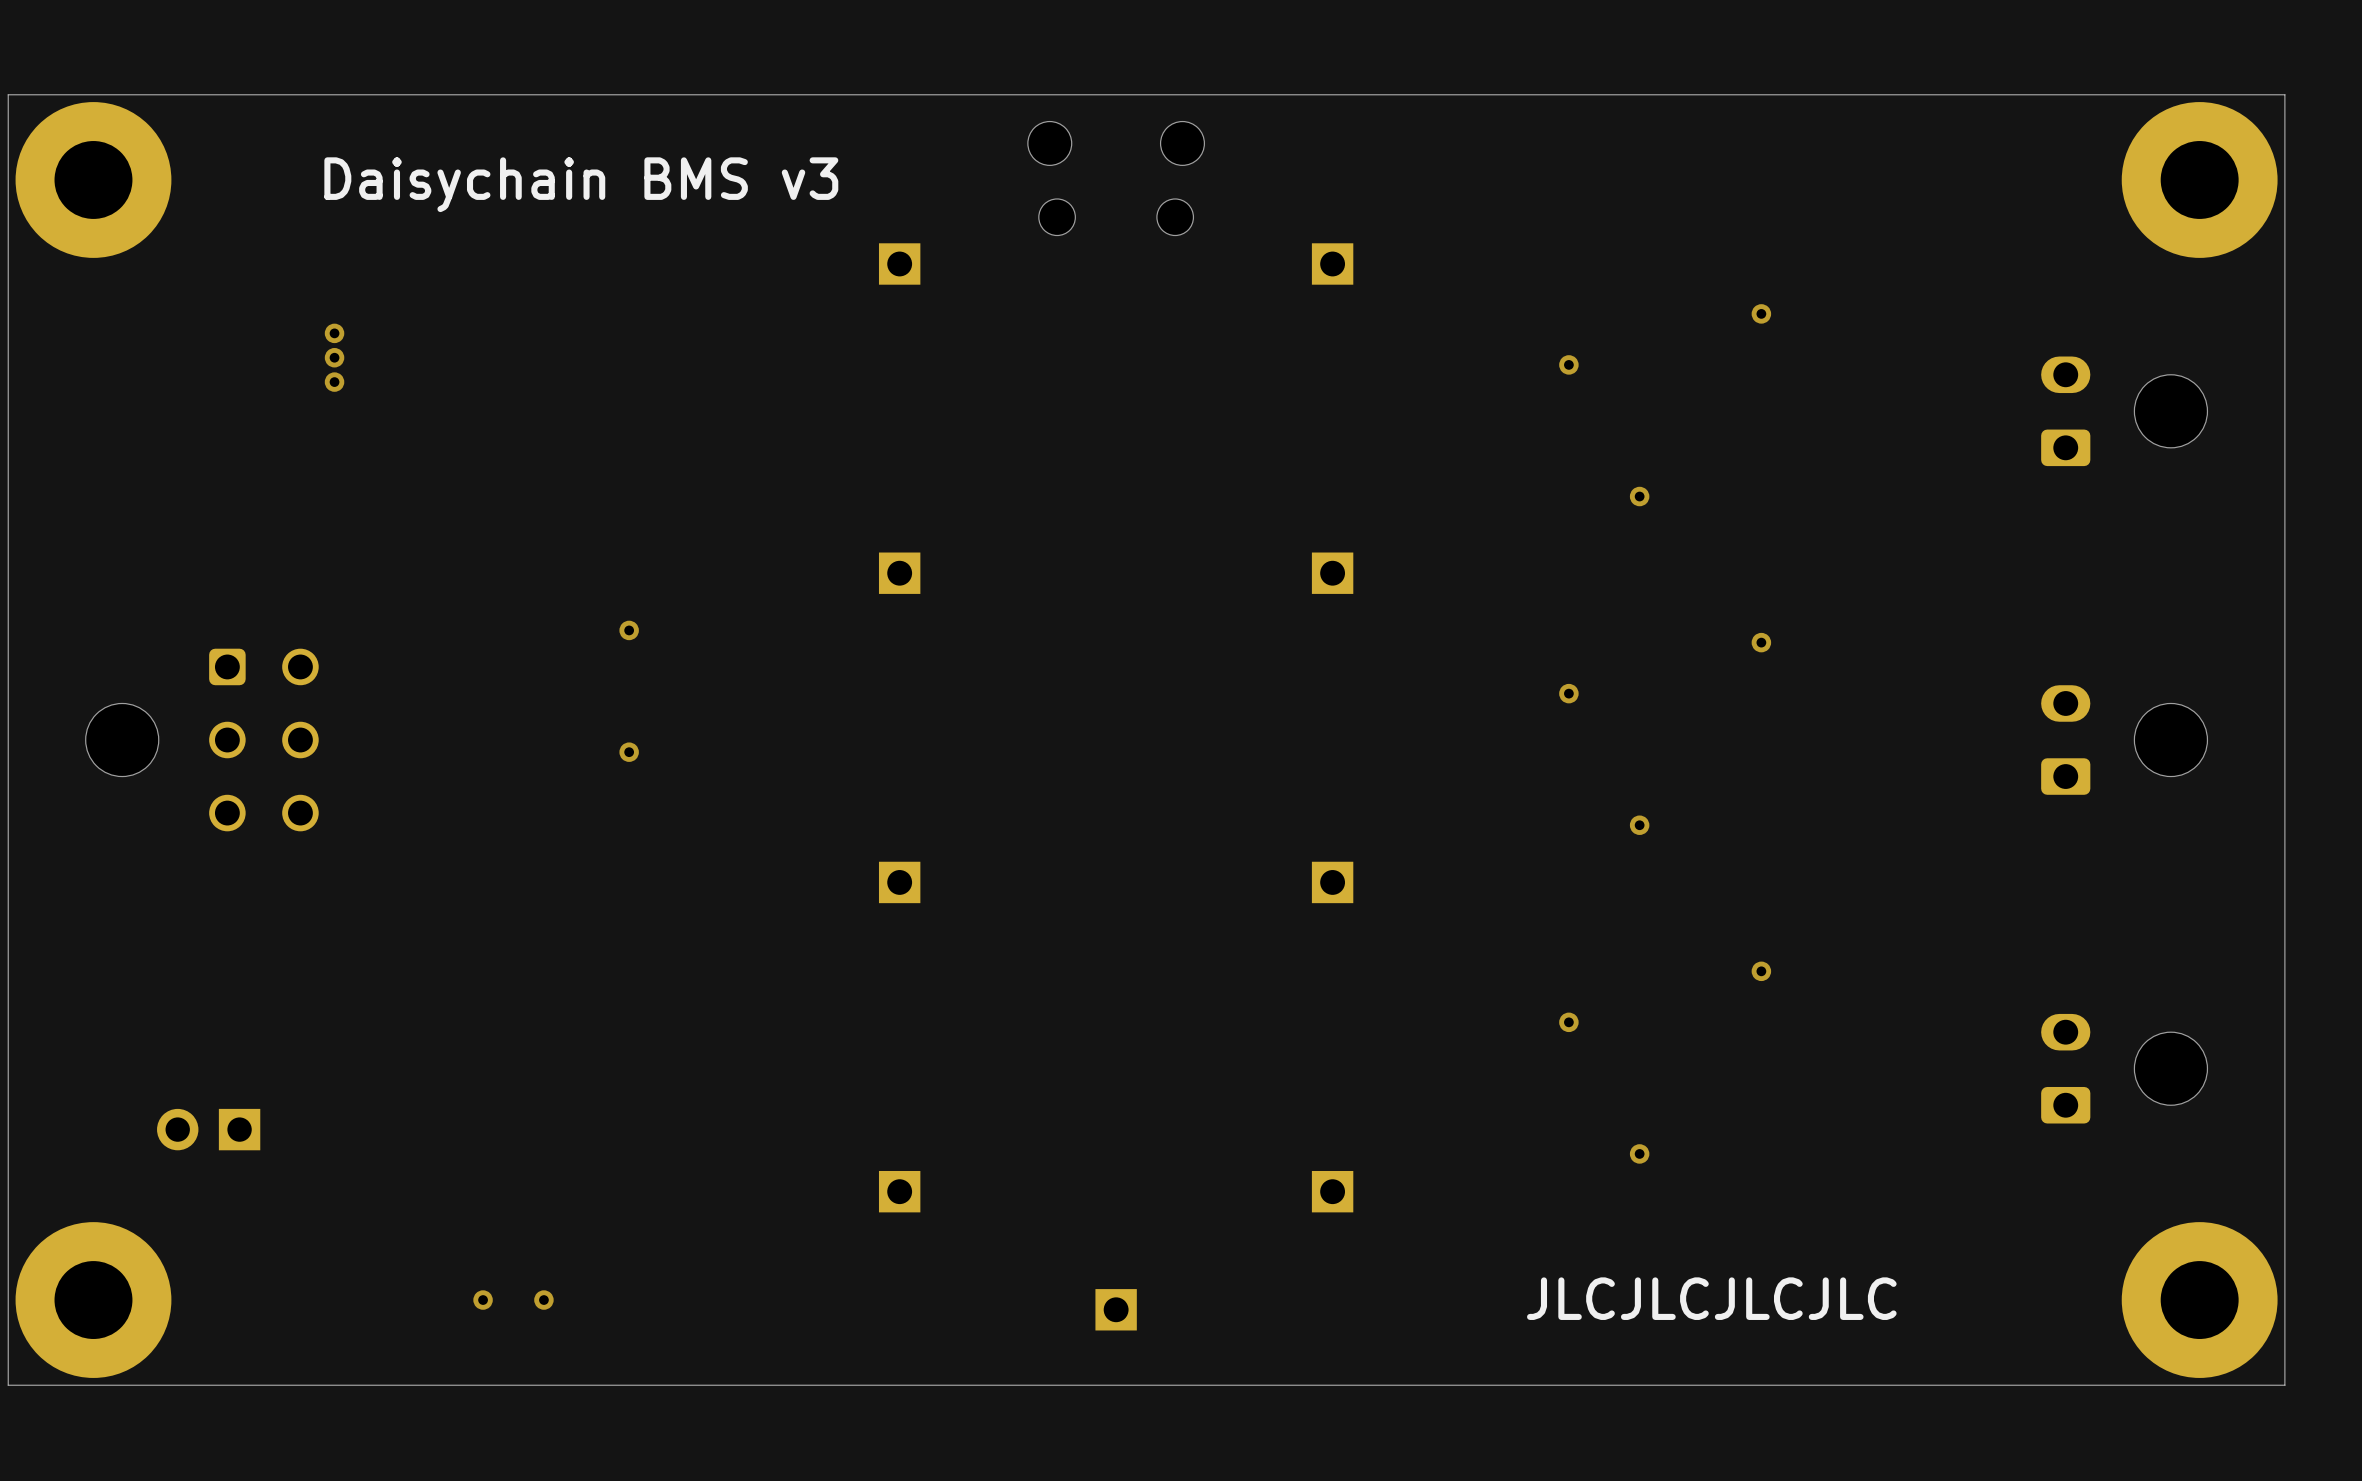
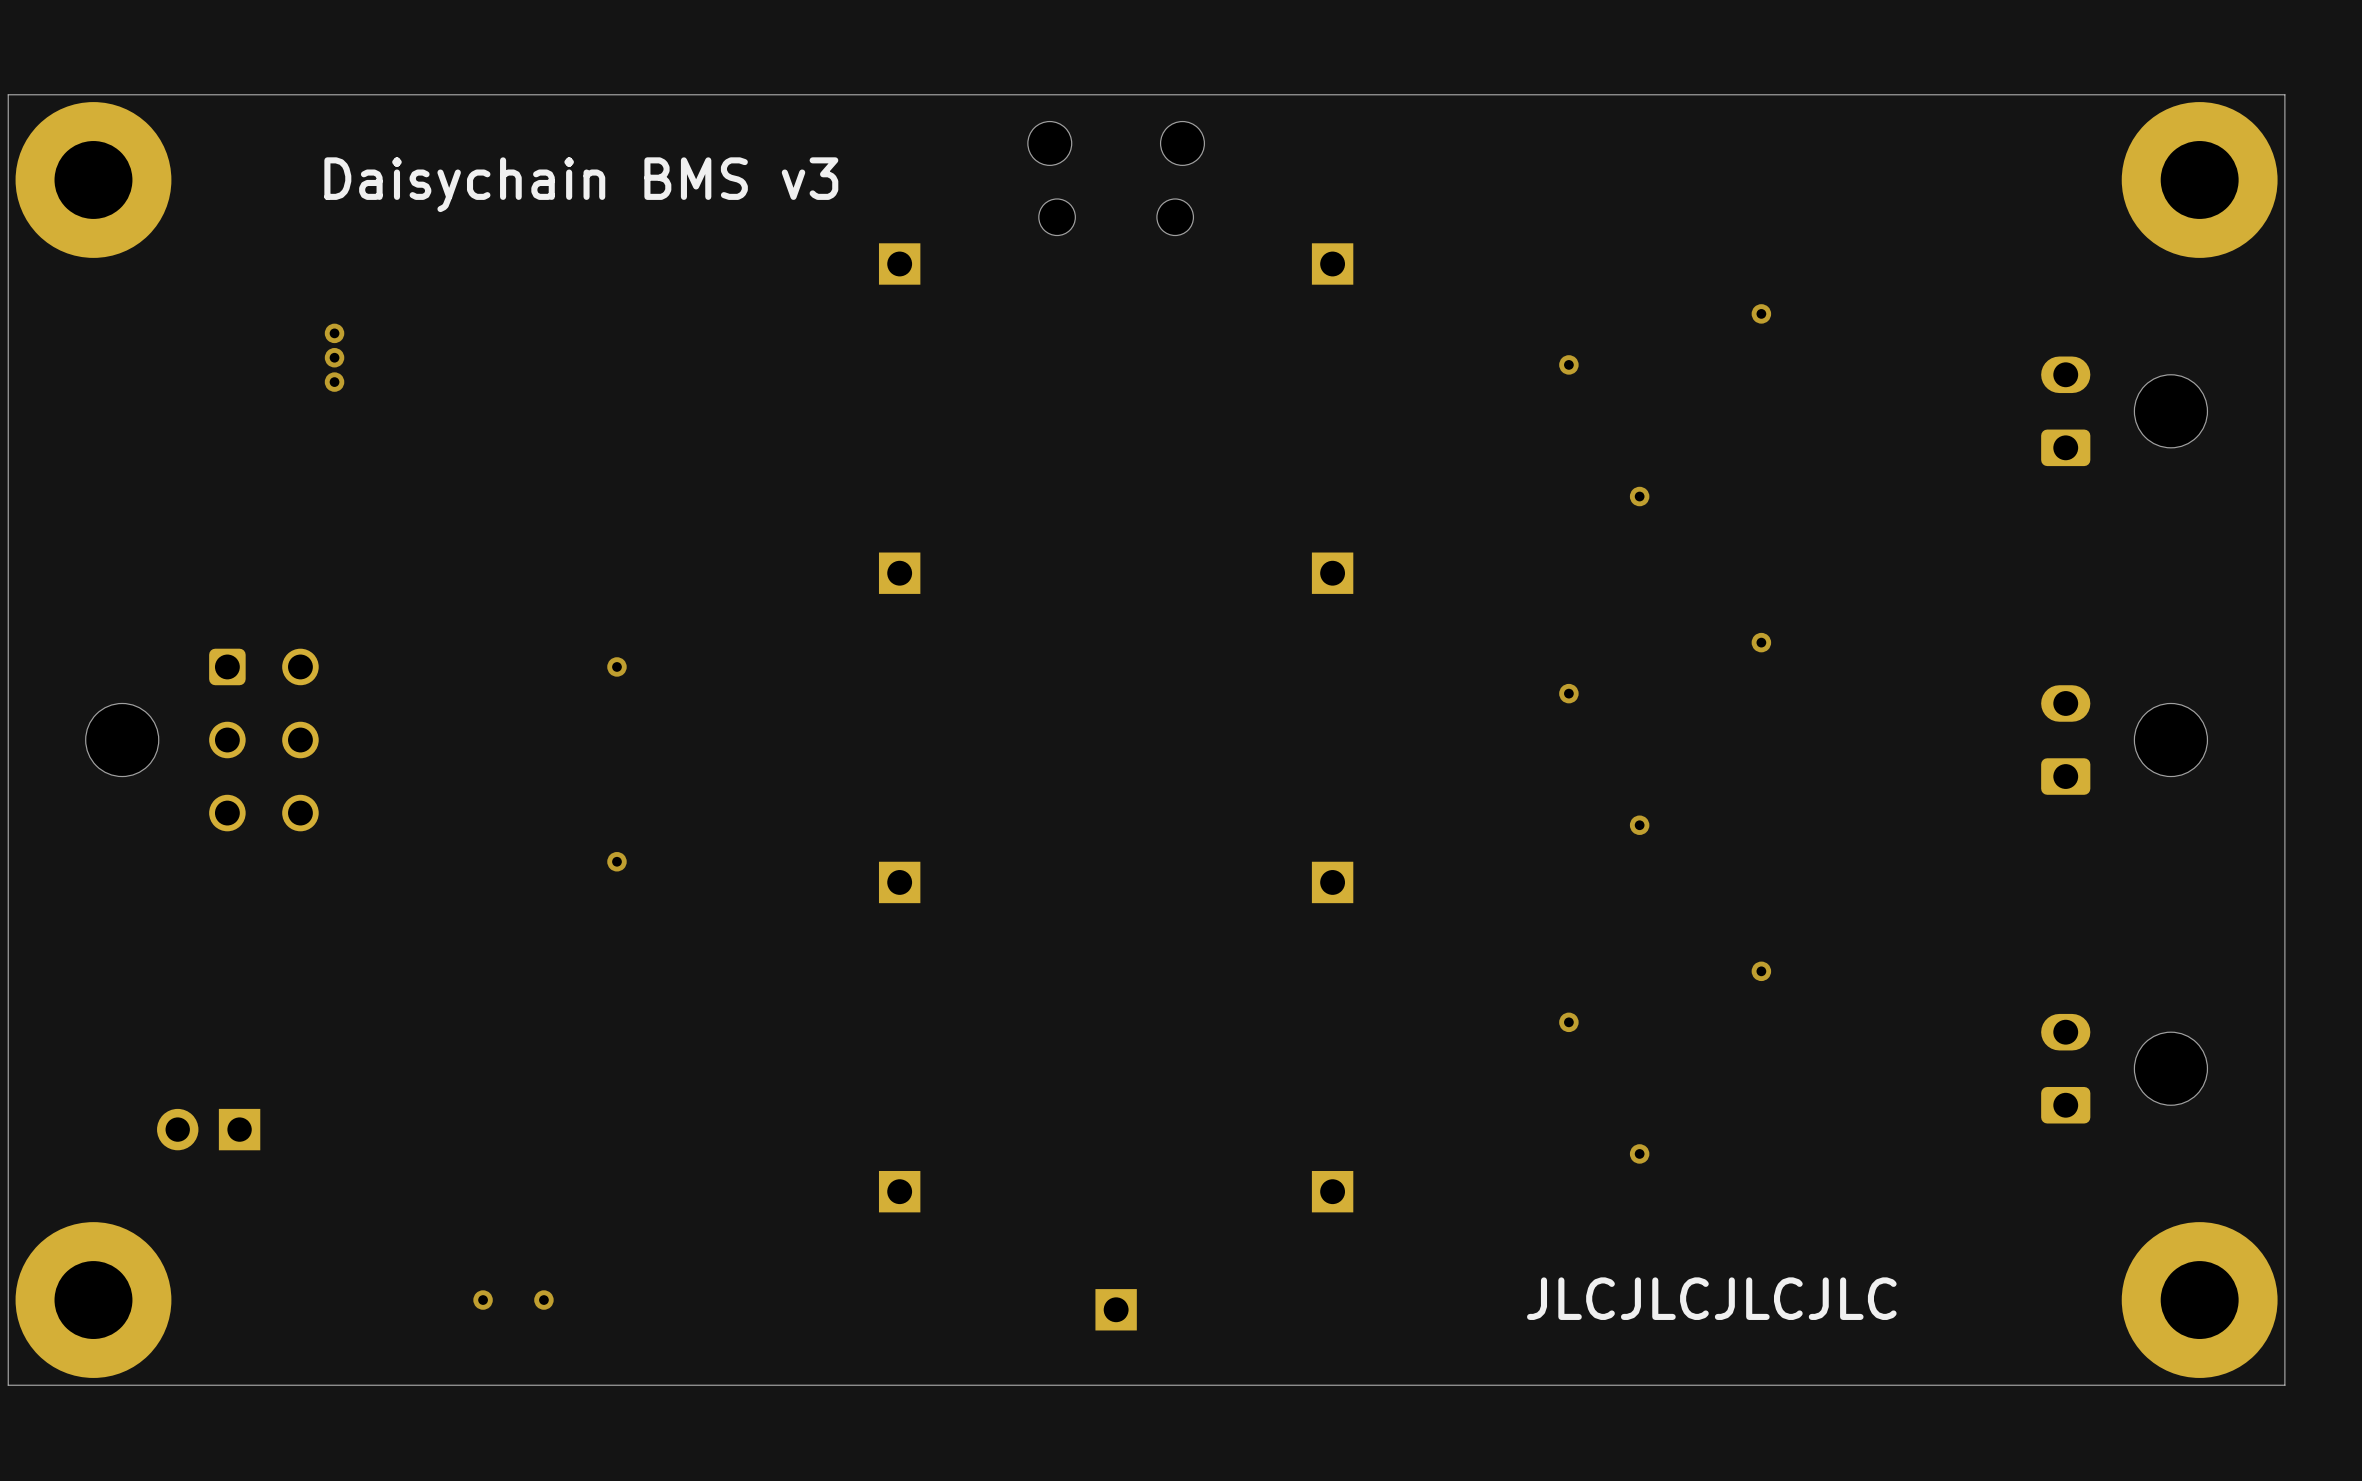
via position: (629, 630) -> (616, 666)
via: (629, 752) -> none
via: none -> (616, 861)

